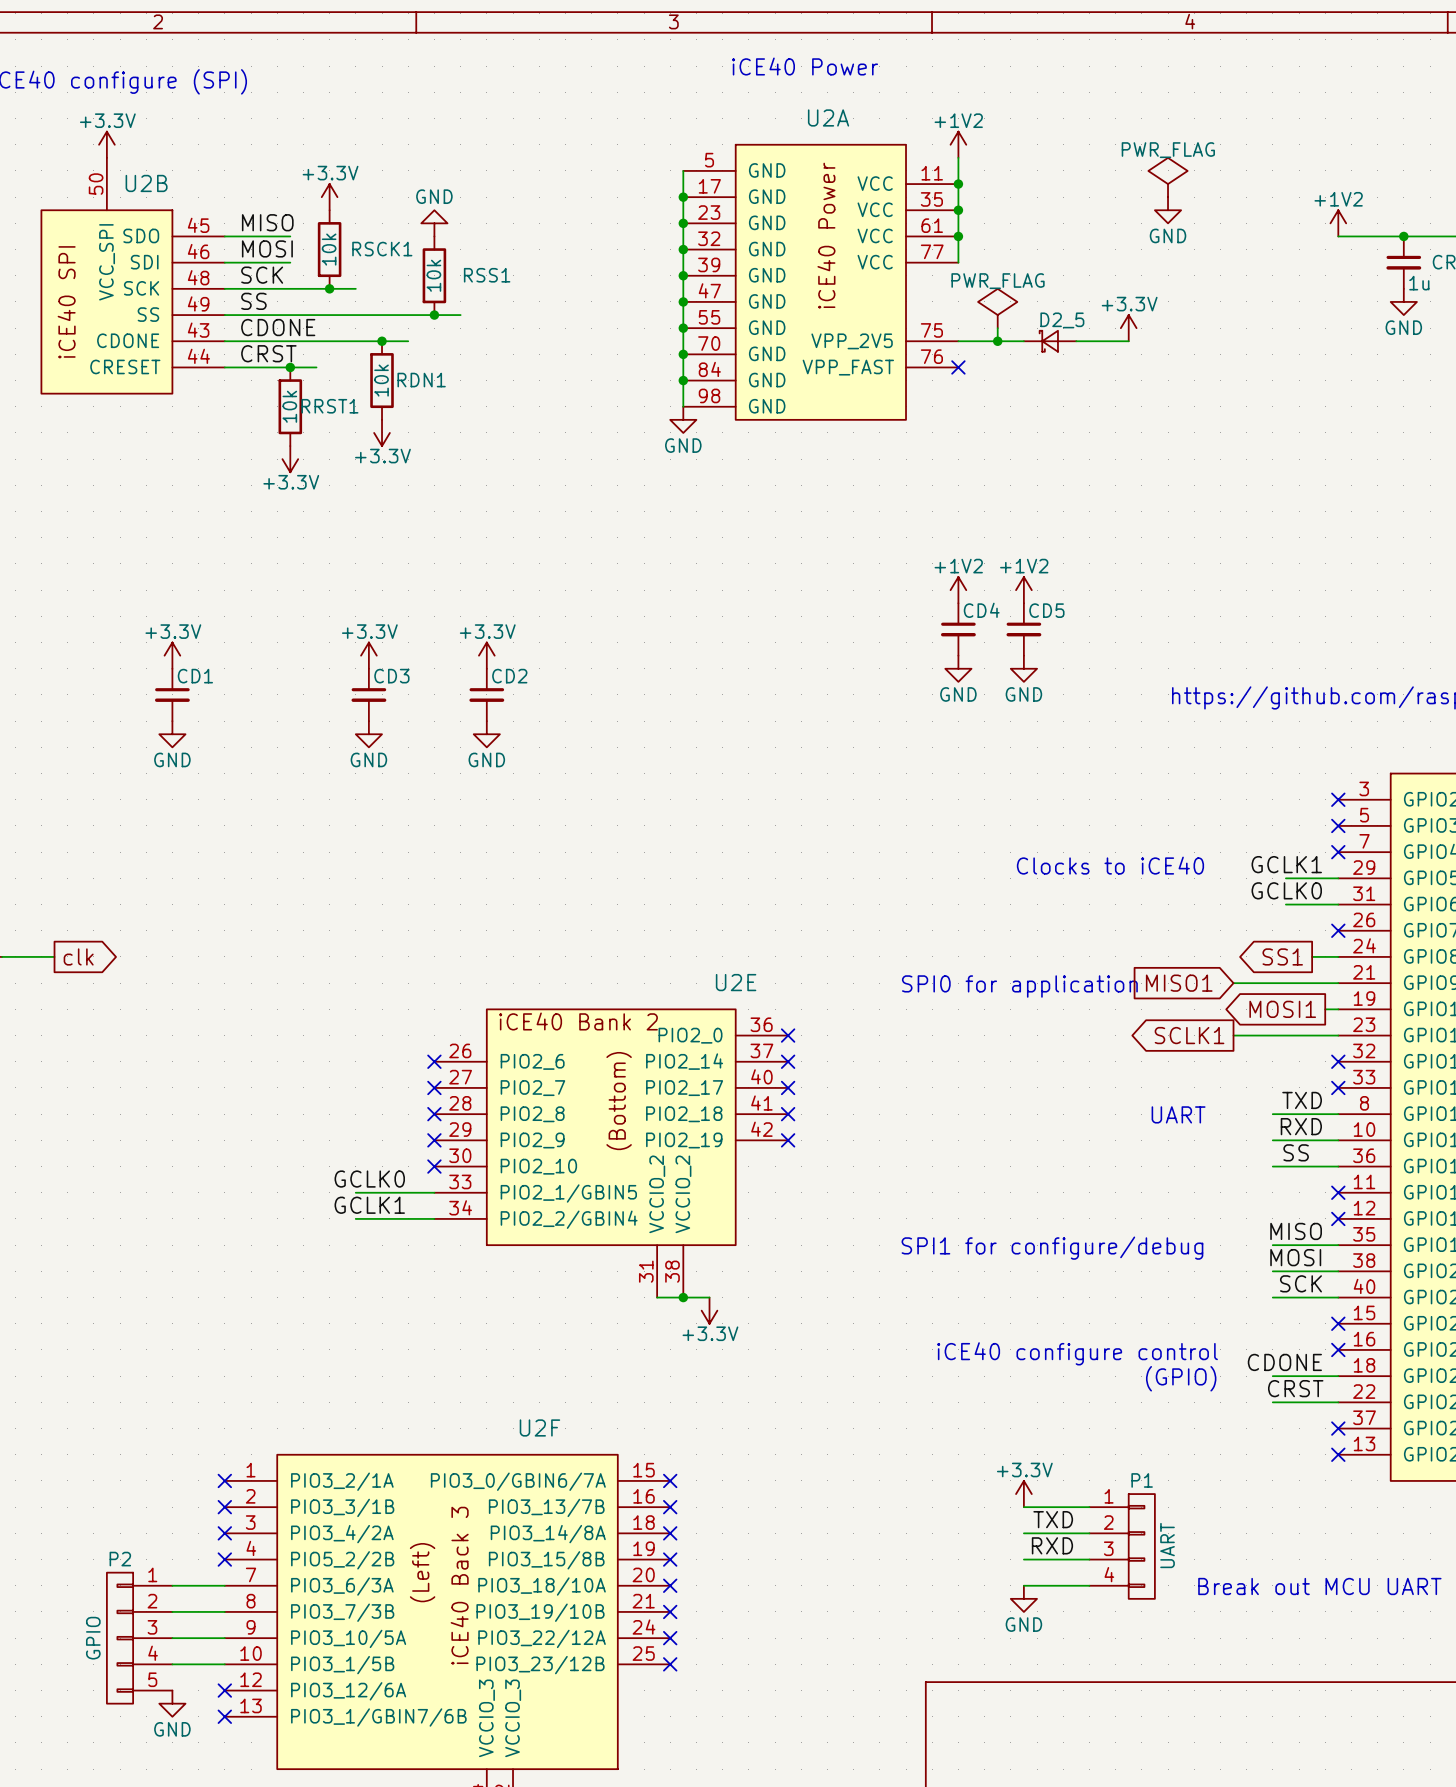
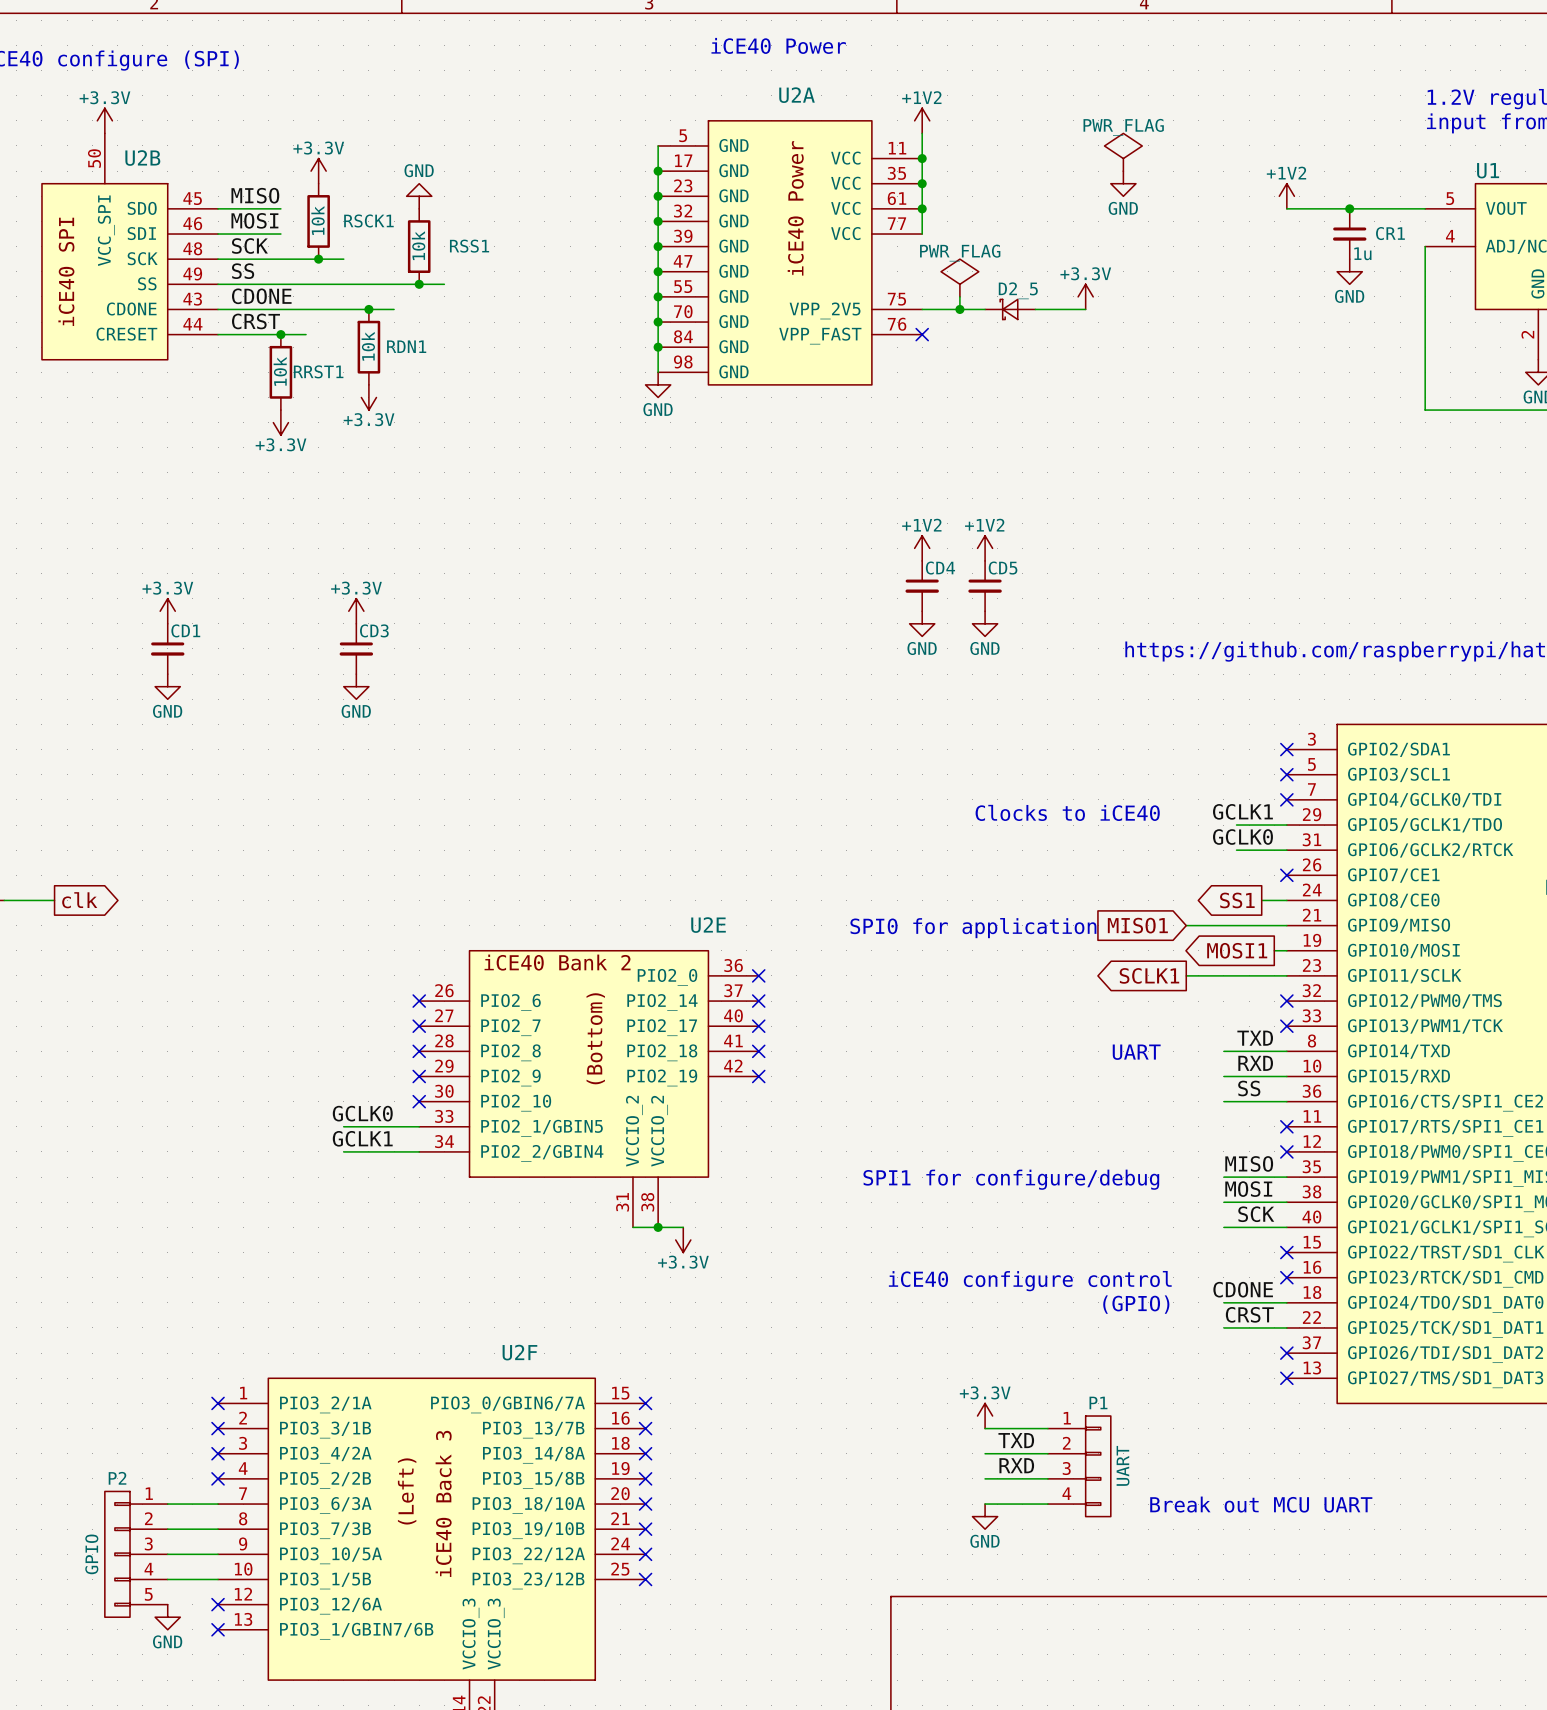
power symbol: +3.3V (486, 655) -> none
CD2: (486, 694) -> none
power symbol: GND (486, 734) -> none

